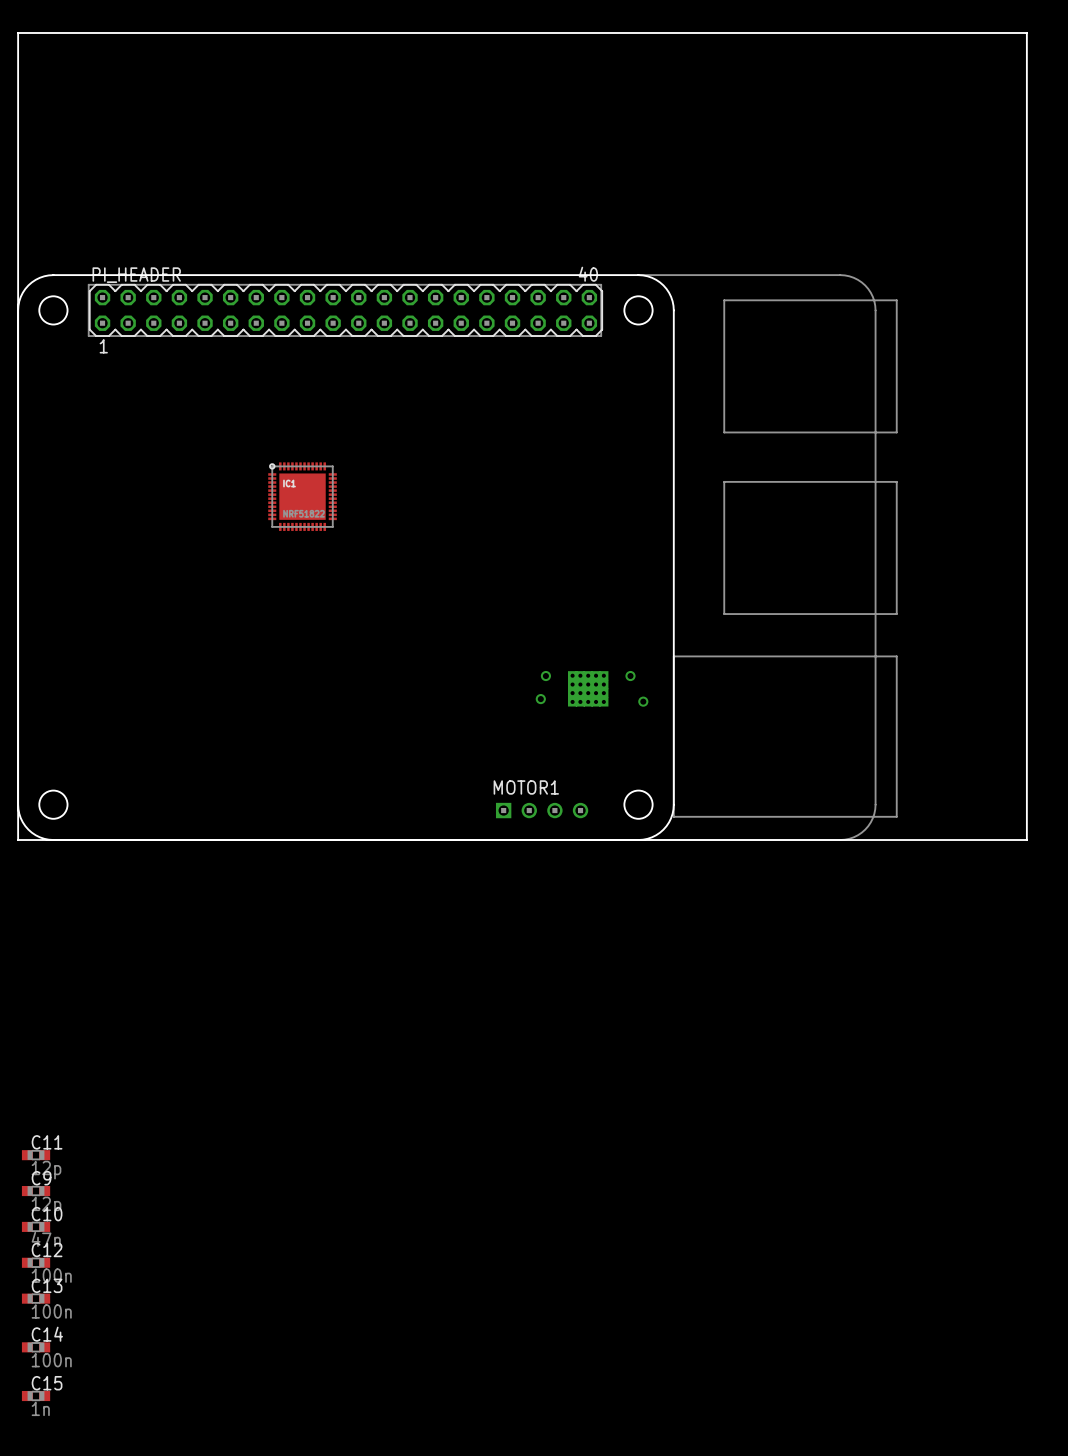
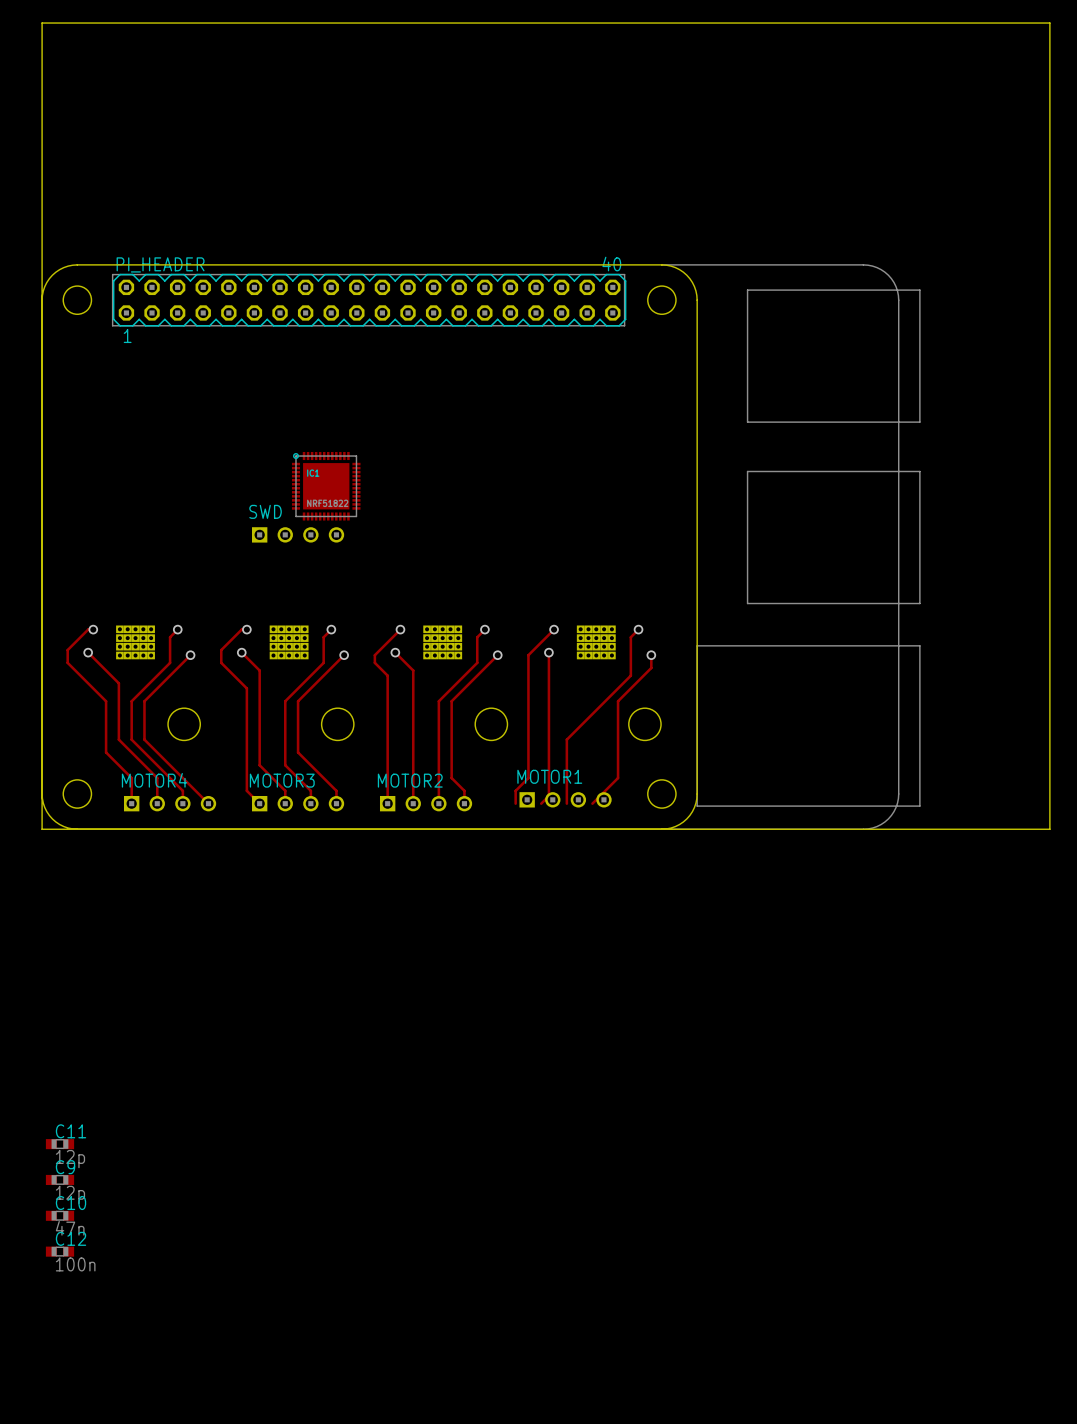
SWD: none -> (298, 534)
track: none -> (93, 629) (88, 629) (67, 650) (67, 662) (106, 701) (106, 752) (131, 778) (131, 803)
via: none -> (93, 629)
track: none -> (177, 629) (170, 637) (170, 662) (131, 701) (131, 739) (182, 790) (182, 803)
via: none -> (177, 629)
track: none -> (246, 629) (241, 629) (221, 650) (221, 662) (246, 688) (246, 790) (259, 803)
via: none -> (246, 629)
track: none -> (331, 629) (323, 637) (323, 662) (285, 701) (285, 765) (310, 790) (310, 803)
via: none -> (331, 629)
track: none -> (400, 629) (374, 655) (374, 662) (387, 675) (387, 803)
via: none -> (400, 629)
track: none -> (484, 629) (477, 637) (477, 662) (438, 701) (438, 803)
via: none -> (484, 629)
track: none -> (554, 629) (528, 655) (528, 778) (515, 790) (515, 803)
via: none -> (554, 629)
track: none -> (638, 629) (630, 637) (630, 675) (566, 739) (566, 803)
via: none -> (638, 629)
part: none -> (135, 642)
part: none -> (289, 642)
part: none -> (442, 642)
part: none -> (596, 642)
track: none -> (88, 652) (118, 683) (118, 739) (157, 778) (157, 803)
via: none -> (88, 652)
track: none -> (241, 652) (259, 670) (259, 765) (285, 790) (285, 803)
via: none -> (241, 652)
track: none -> (395, 652) (413, 670) (413, 803)
via: none -> (395, 652)
track: none -> (548, 652) (548, 795) (541, 803)
via: none -> (548, 652)
track: none -> (190, 655) (144, 701) (144, 739) (208, 803)
via: none -> (190, 655)
track: none -> (344, 655) (298, 701) (298, 752) (336, 790) (336, 803)
via: none -> (344, 655)
track: none -> (497, 655) (451, 701) (451, 778) (464, 790) (464, 803)
via: none -> (497, 655)
track: none -> (651, 655) (651, 668) (618, 701) (618, 778) (592, 803)
via: none -> (651, 655)
via: (545, 676) -> none
via: (630, 676) -> none
part: (588, 688) -> none
via: (540, 699) -> none
via: (643, 701) -> none
part: none -> (184, 724)
part: none -> (337, 724)
part: none -> (491, 724)
part: none -> (644, 724)
MOTOR4: none -> (170, 803)
MOTOR3: none -> (298, 803)
MOTOR2: none -> (426, 803)
C13: 100n (36, 1298) -> none
C14: 100n (36, 1347) -> none
C15: 1n (36, 1396) -> none

